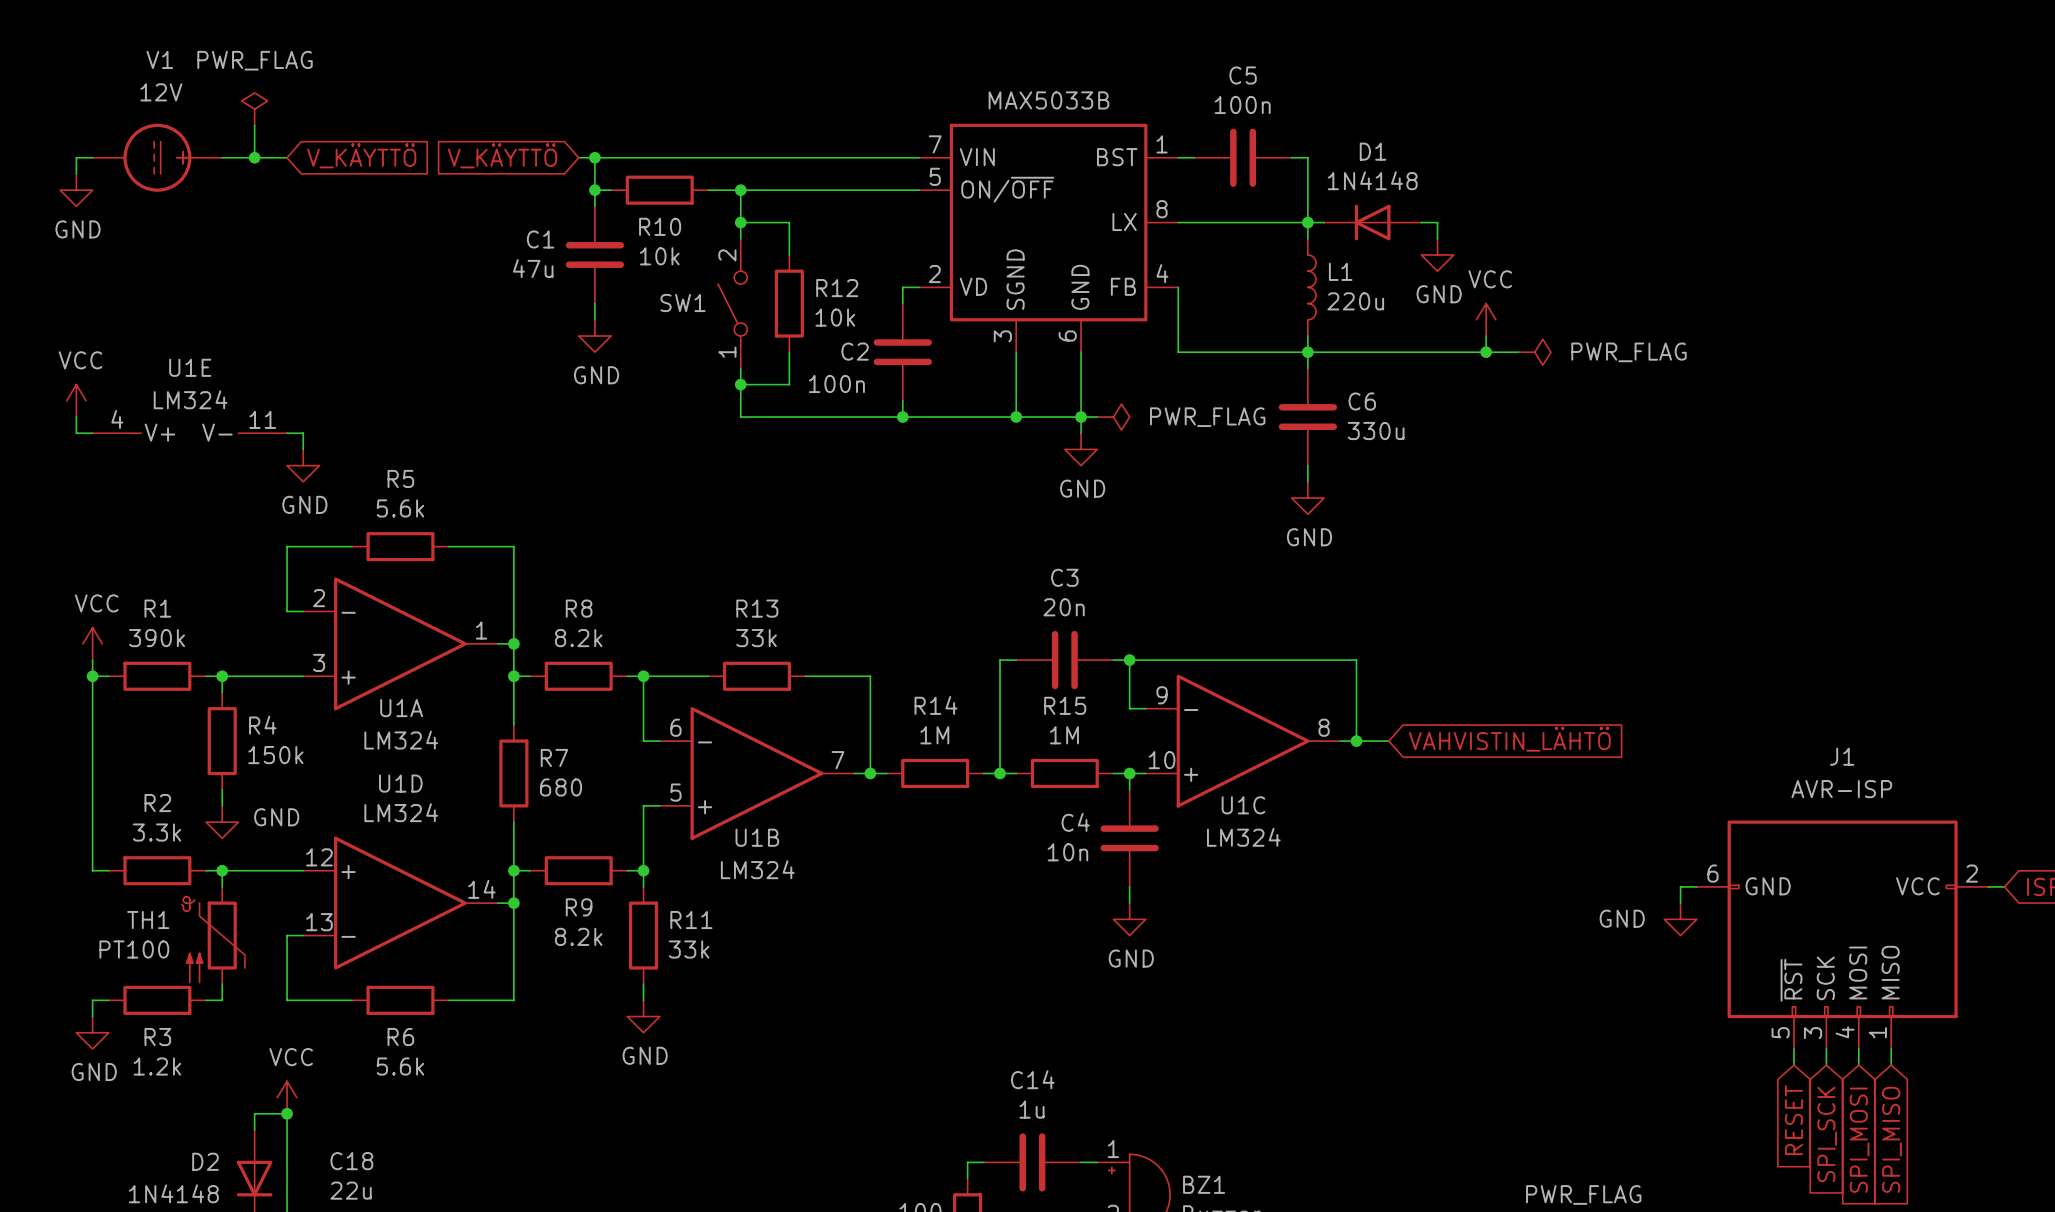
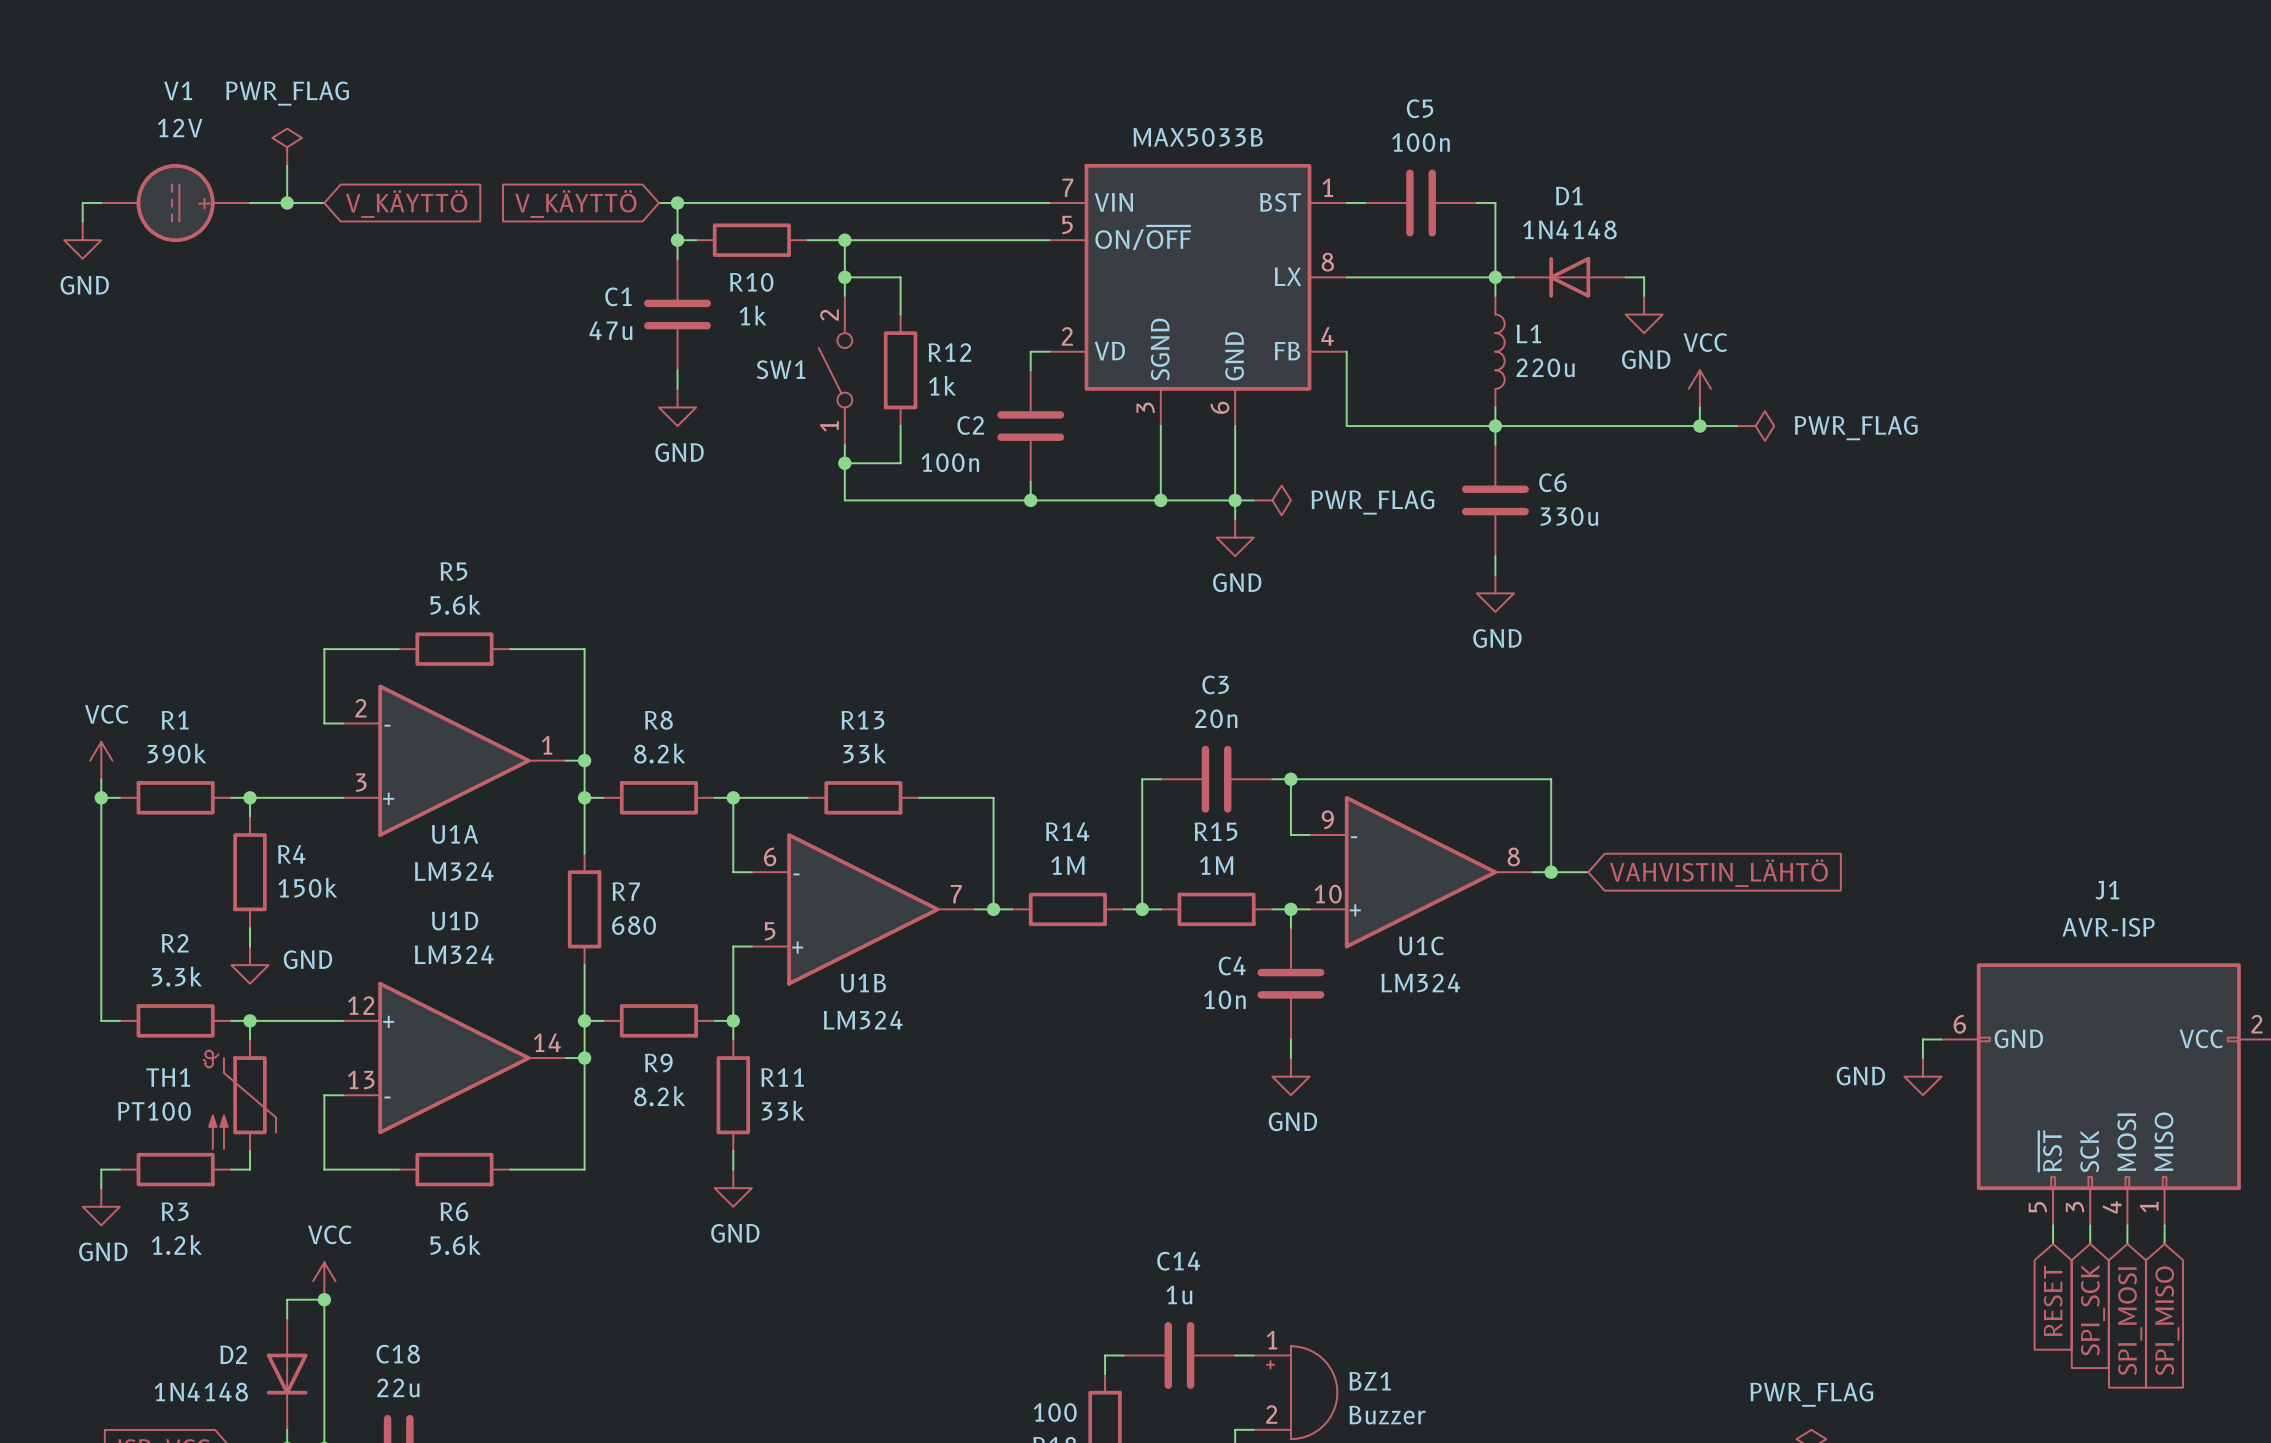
R10 value: 10k (659, 256) -> 1k (753, 315)
R12 value: 10k (835, 317) -> 1k (942, 385)
power symbol: VCC (76, 400) -> none
wire: (76, 417) (76, 433) (92, 433) -> none
U1E: LM324 (189, 433) -> none
wire: (287, 433) (303, 433) (303, 449) -> none
power symbol: GND (303, 465) -> none

